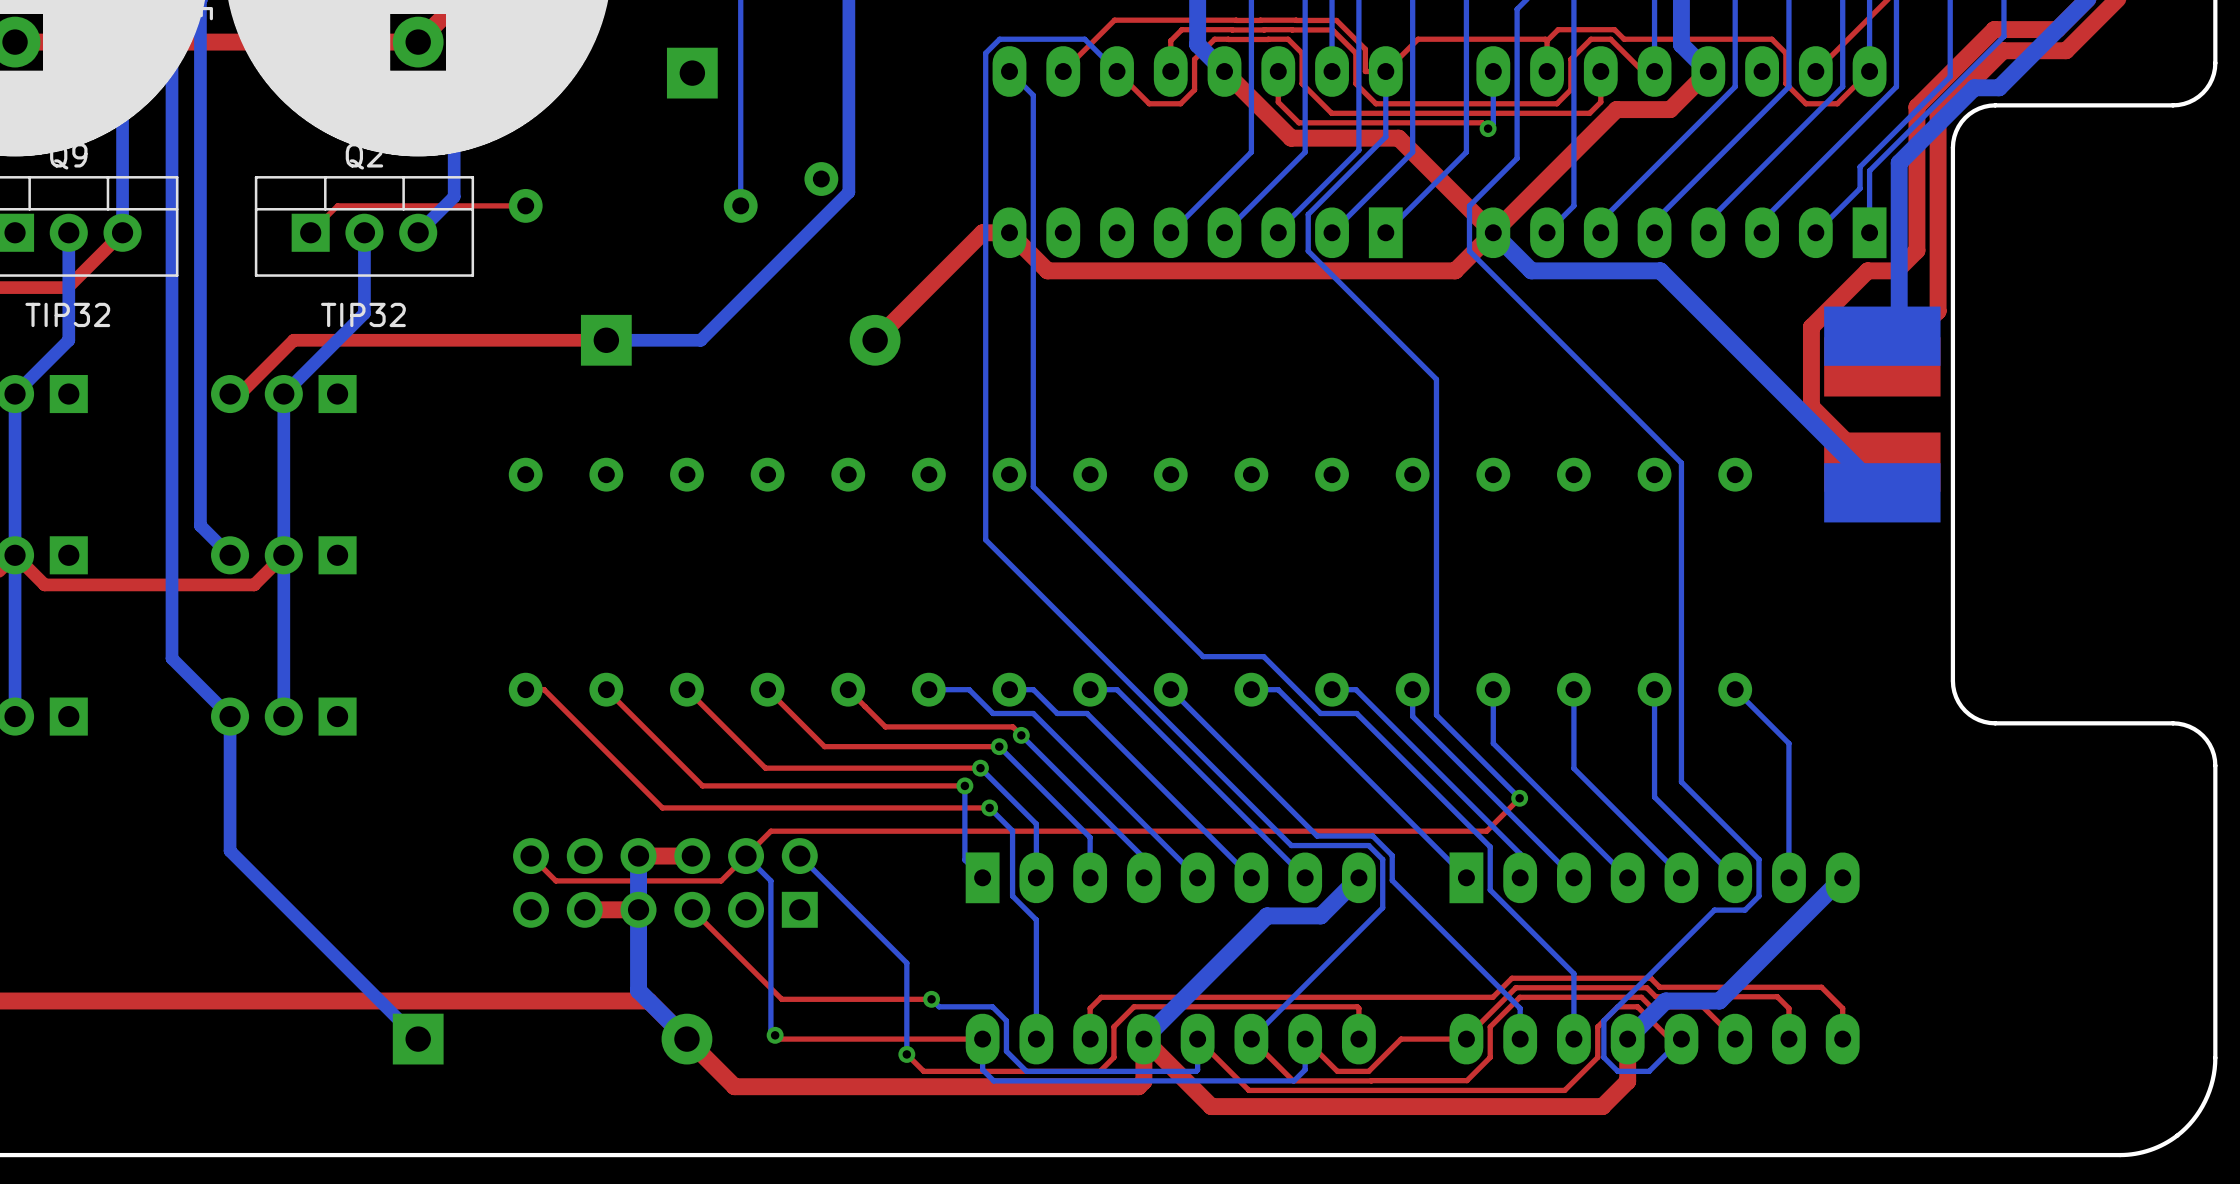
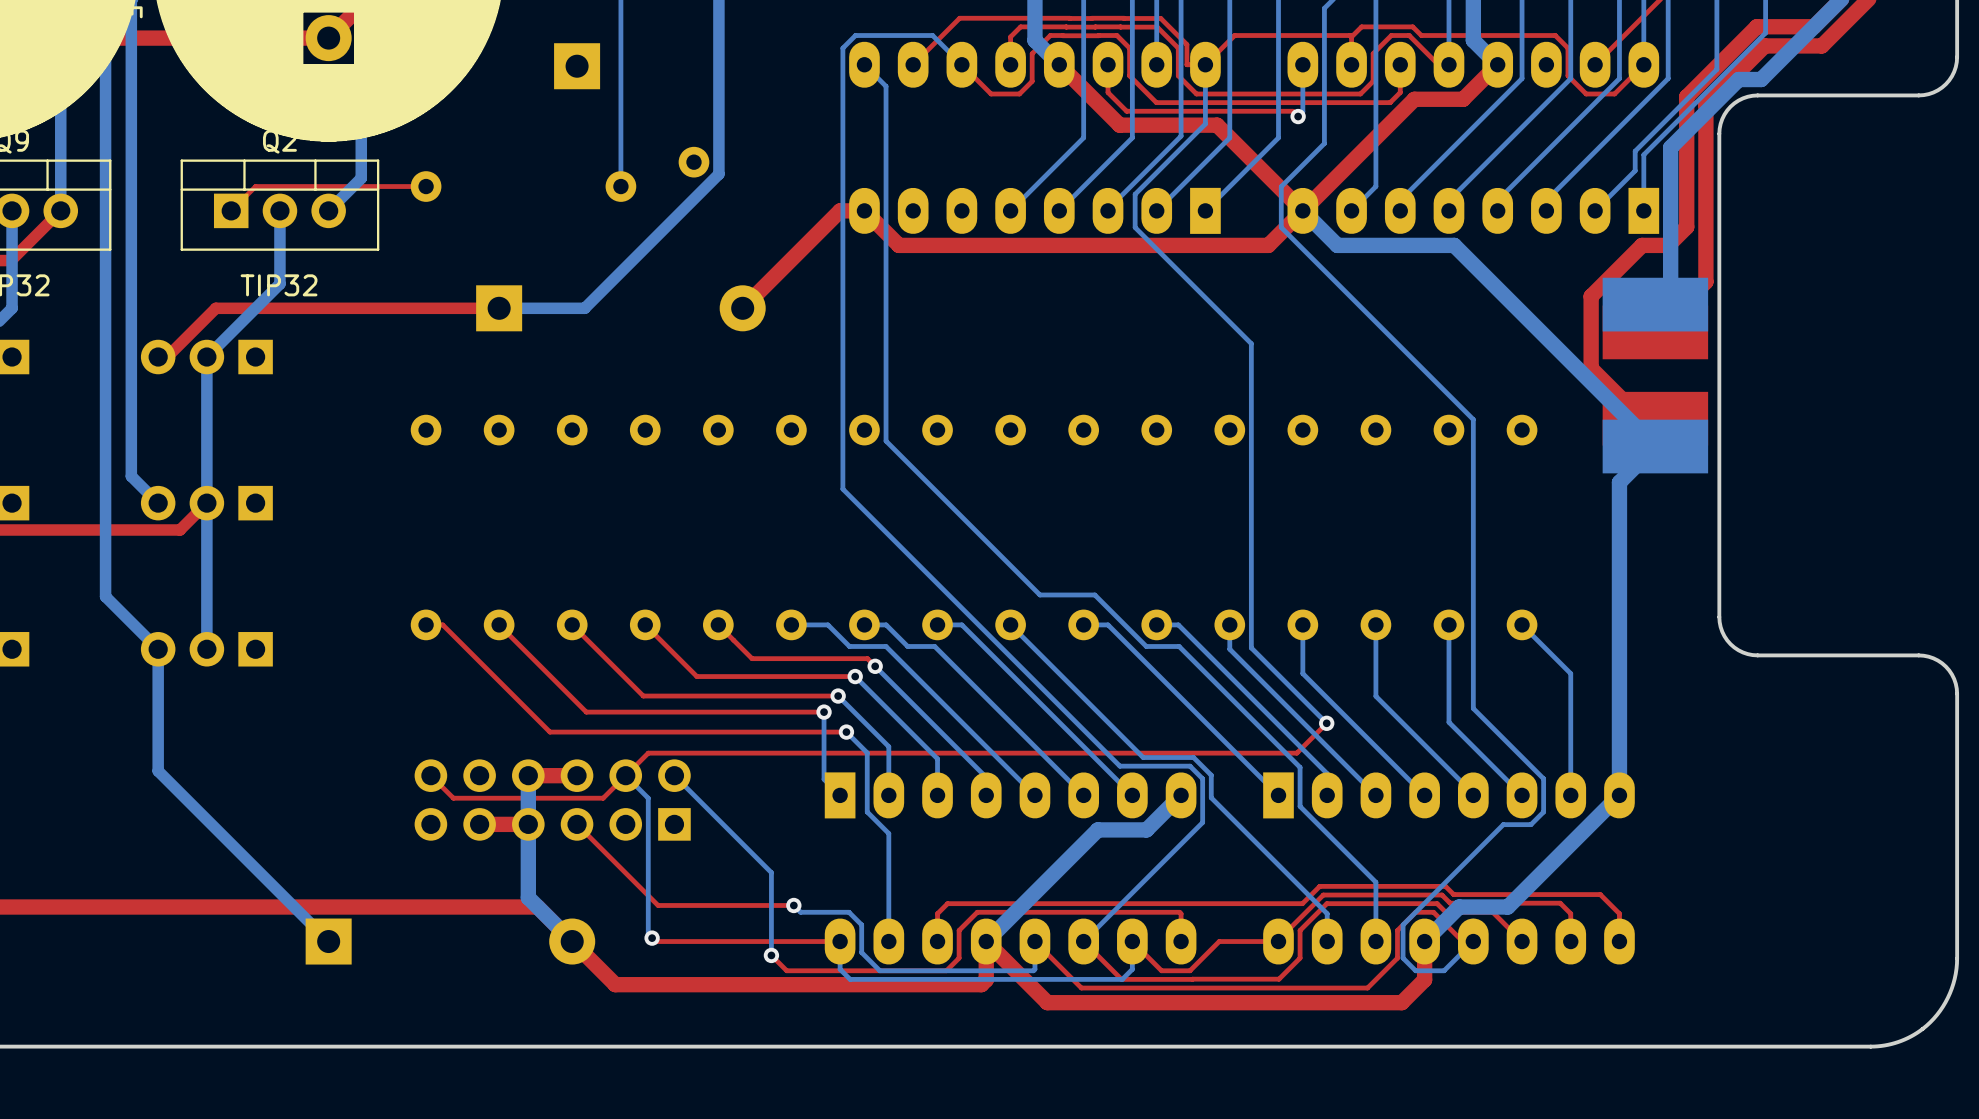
bottom track: none -> (1655, 446) (1619, 482) (1619, 795)

